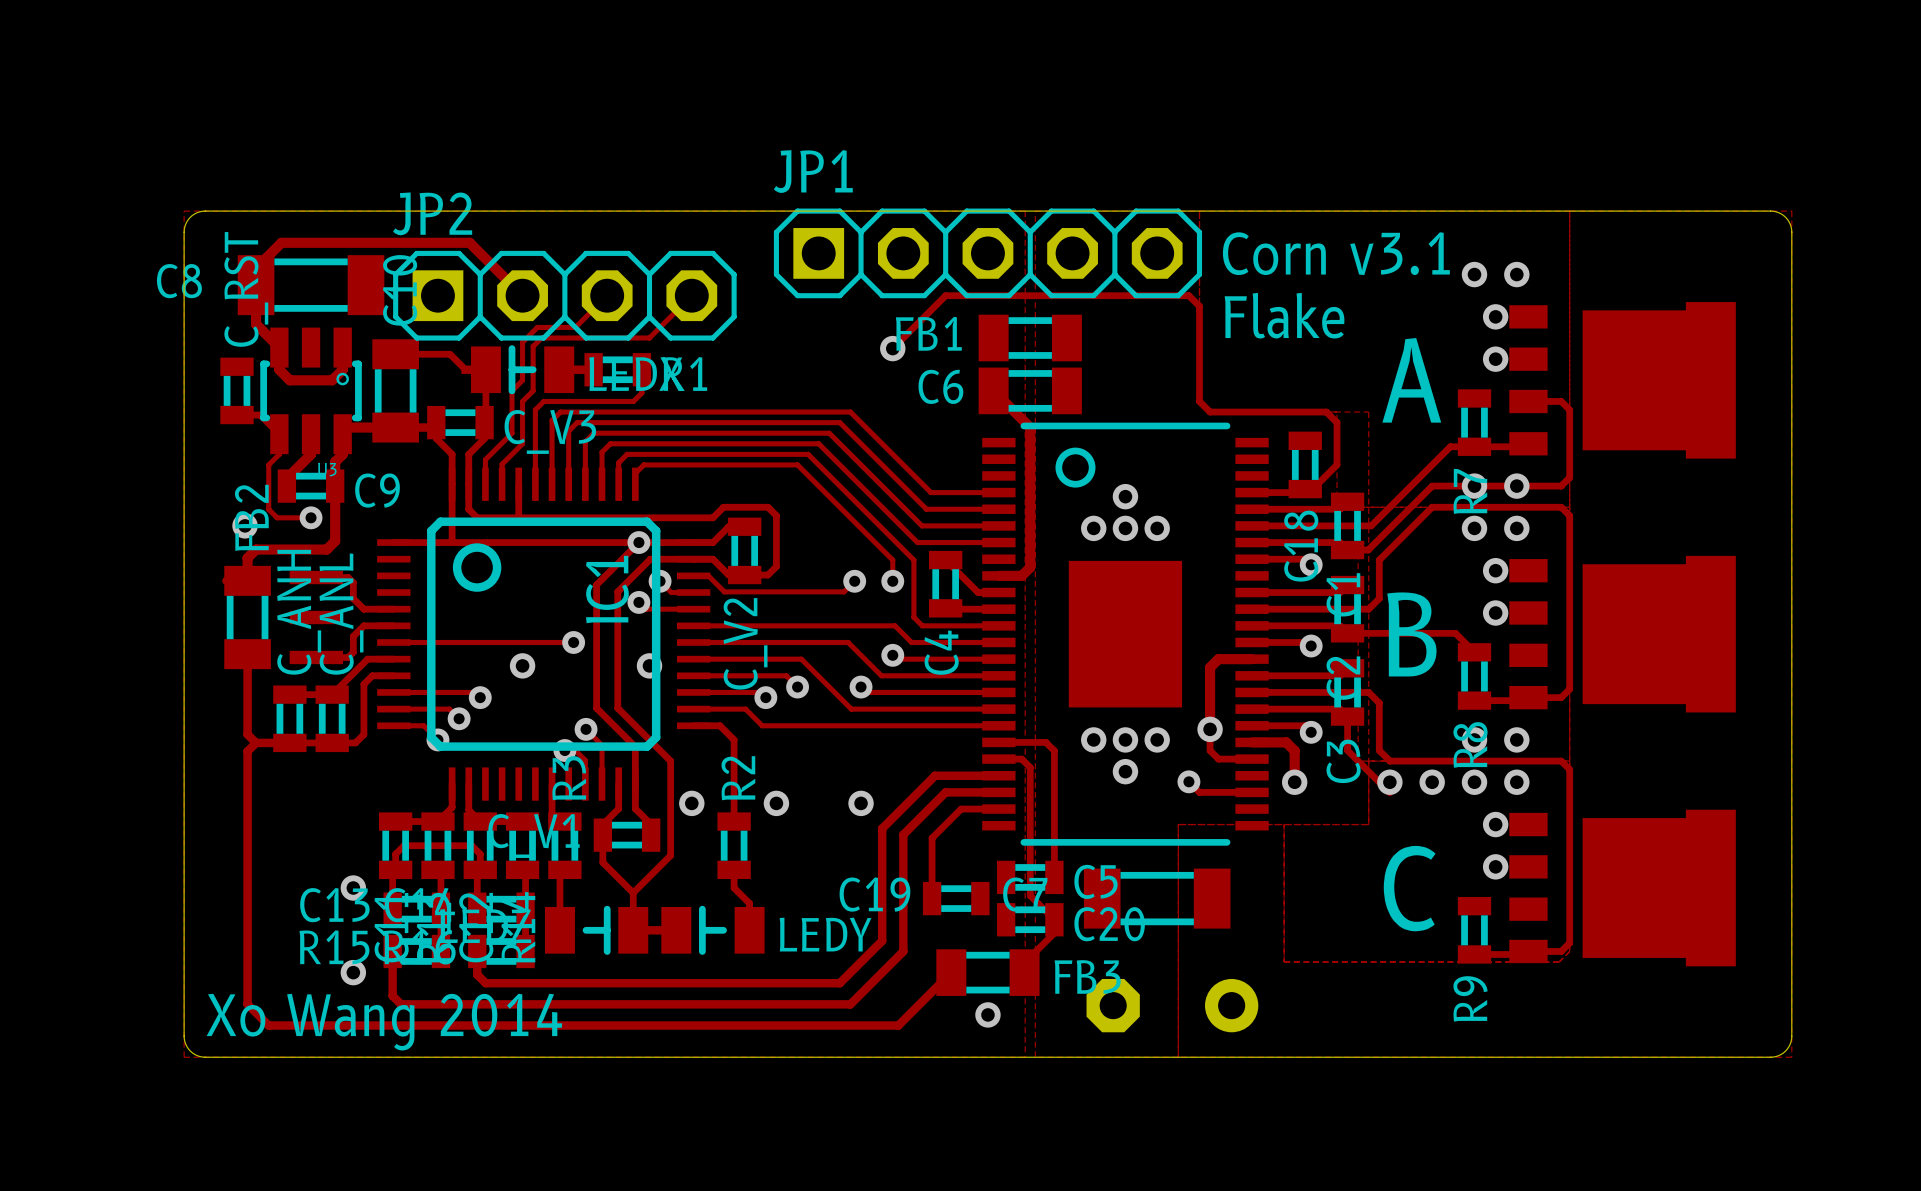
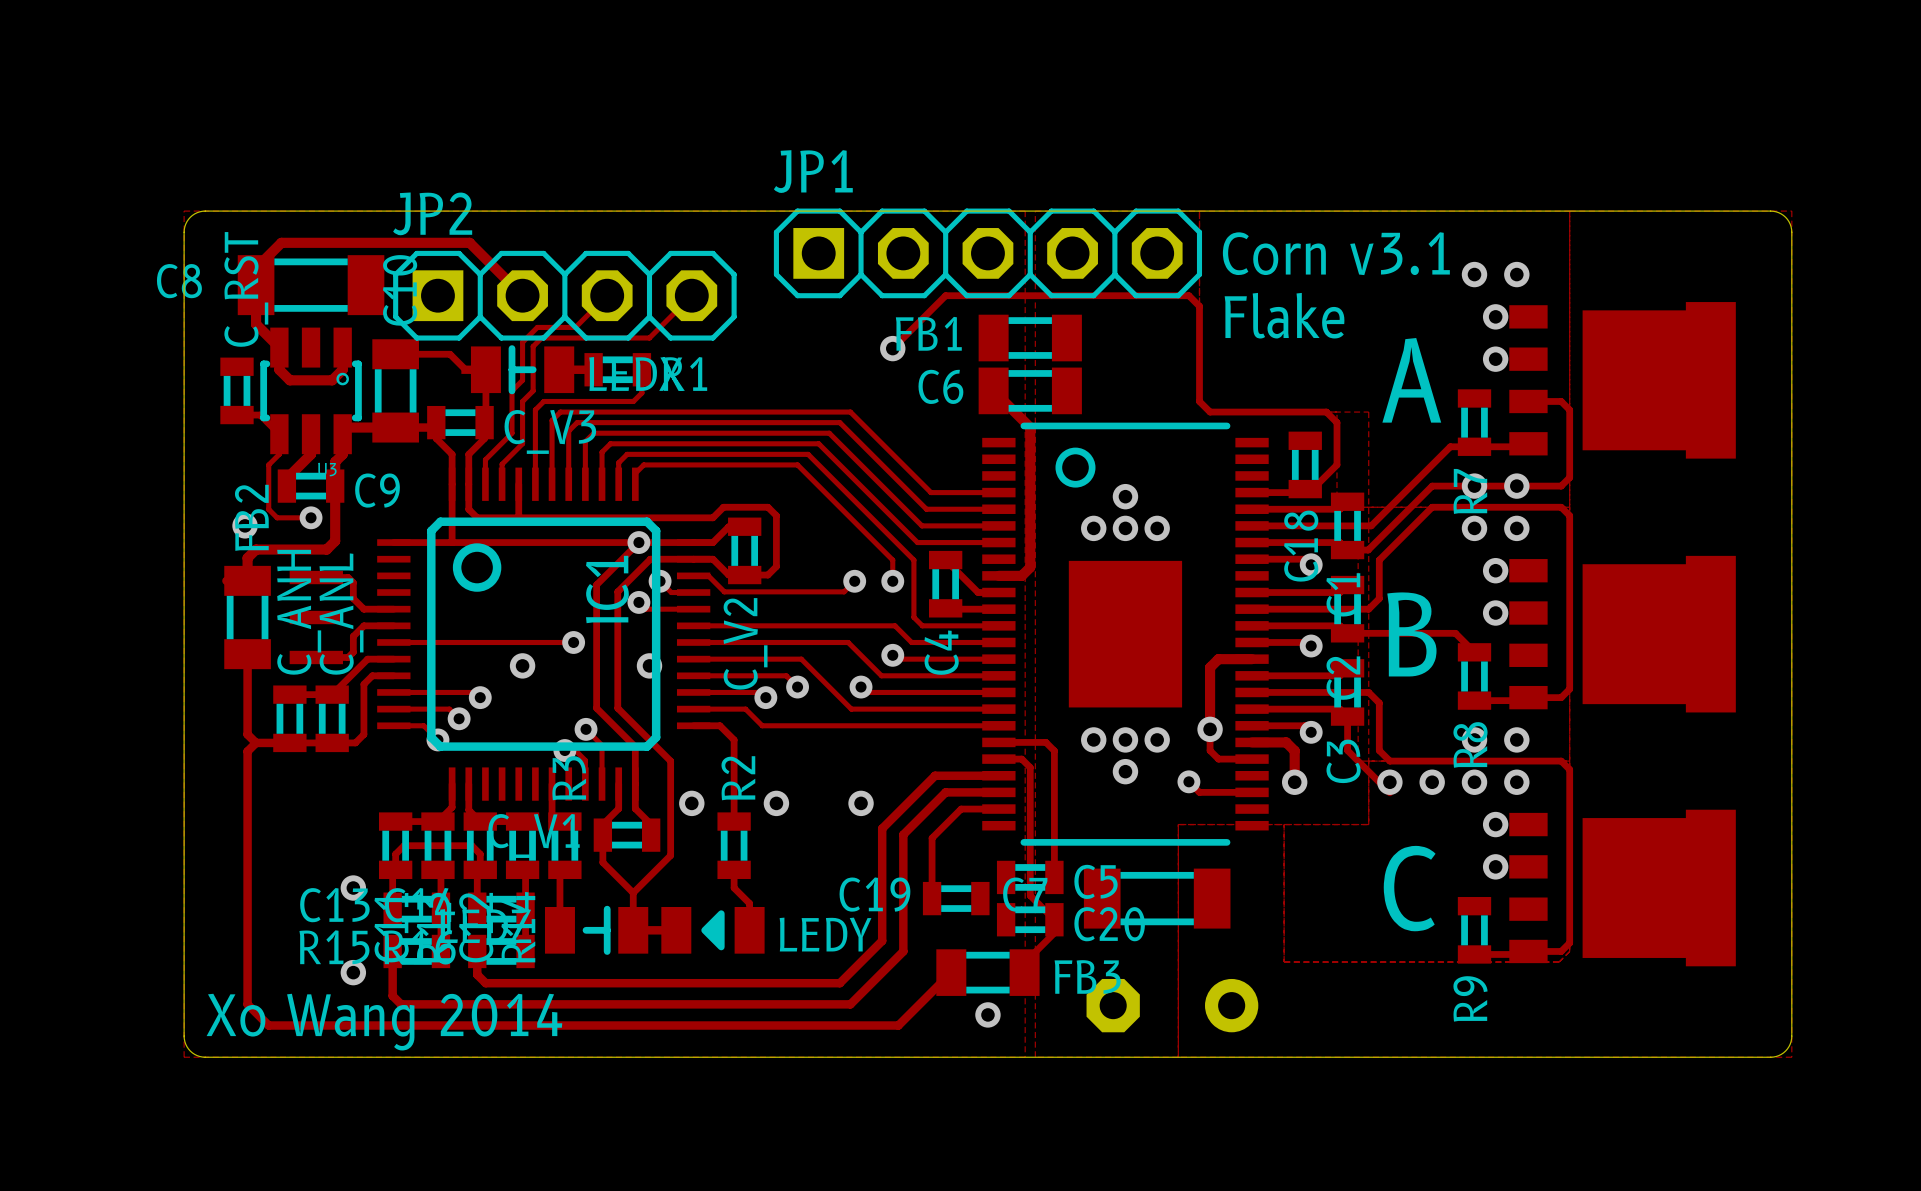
LEDY footprint: [661, 905, 765, 955] -> [661, 907, 765, 954]

